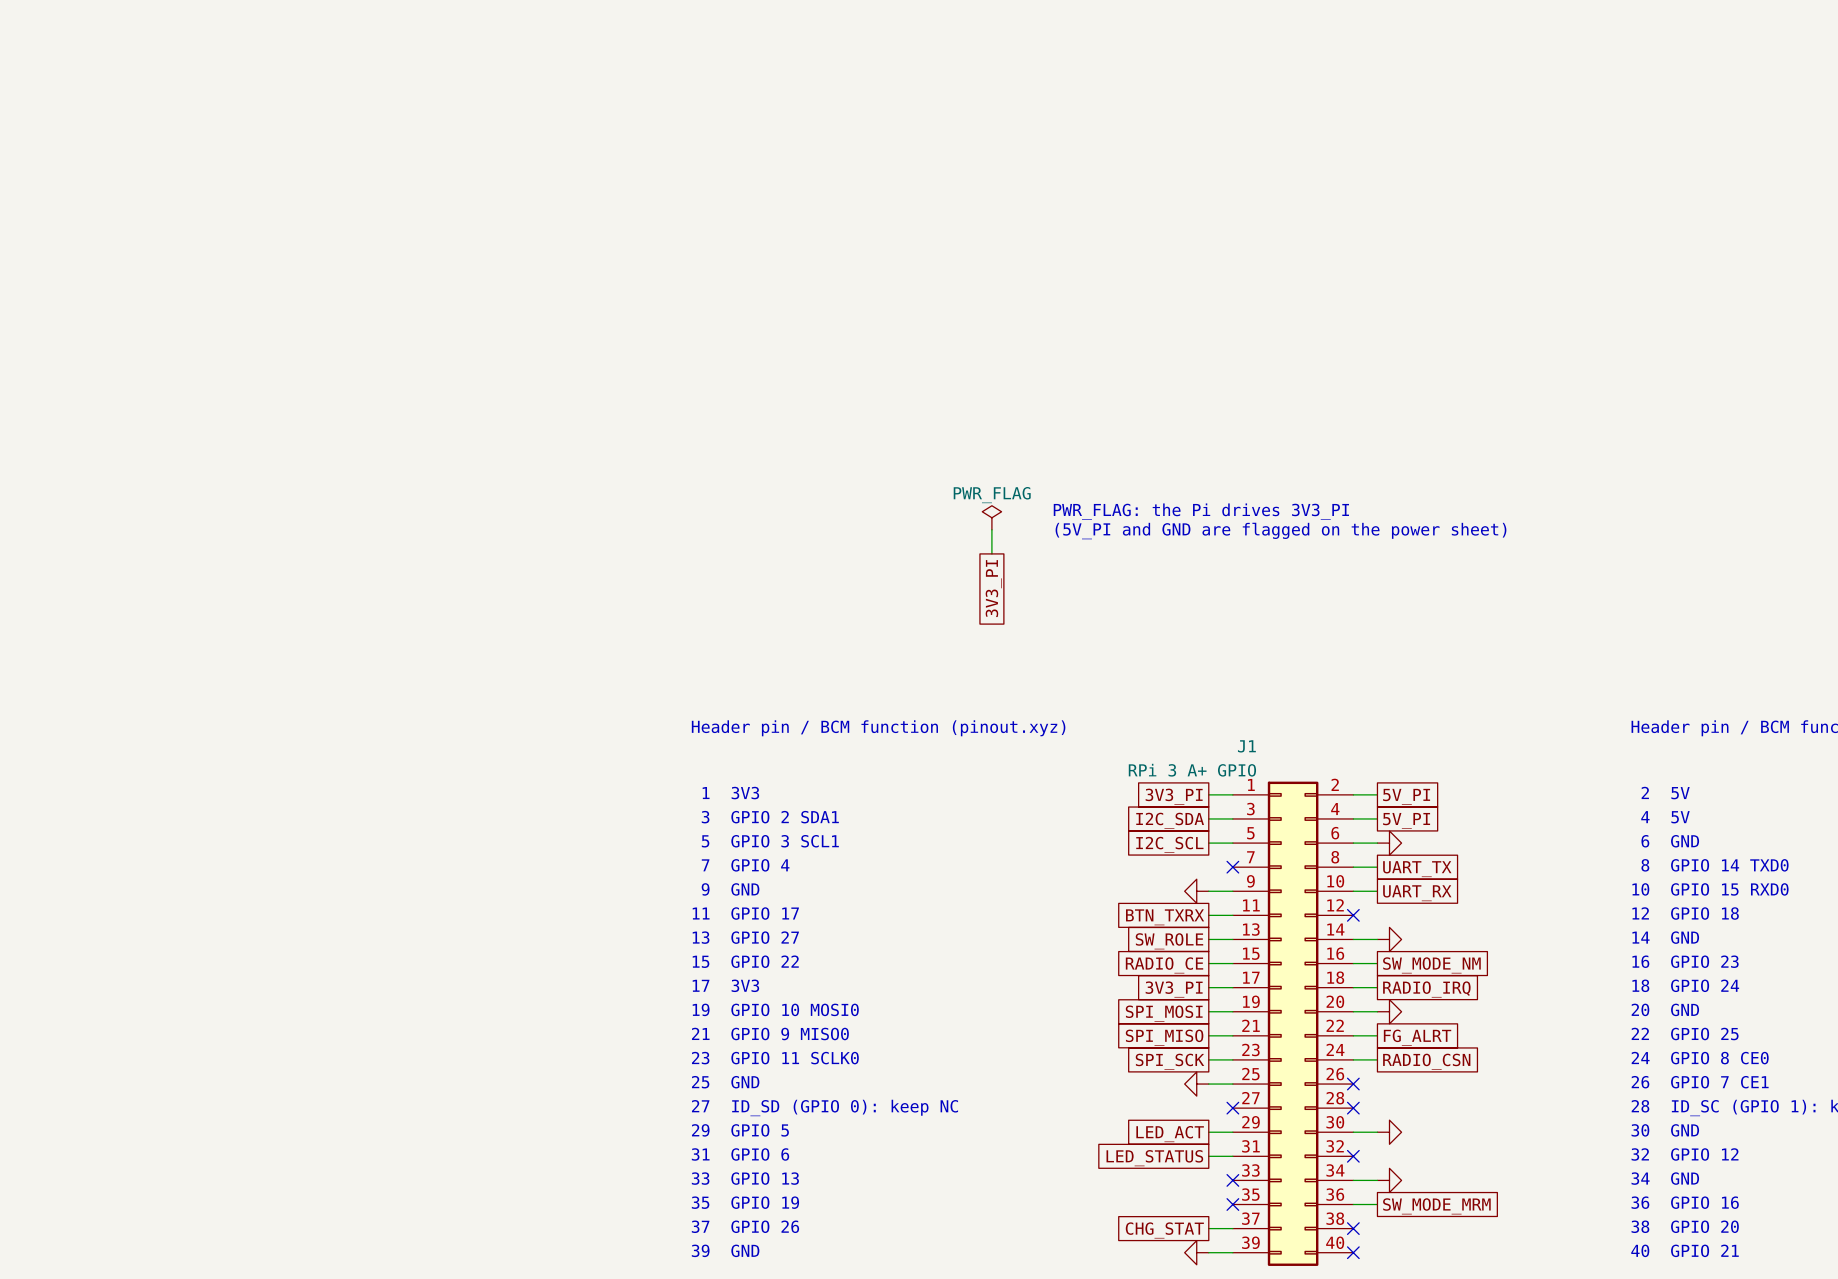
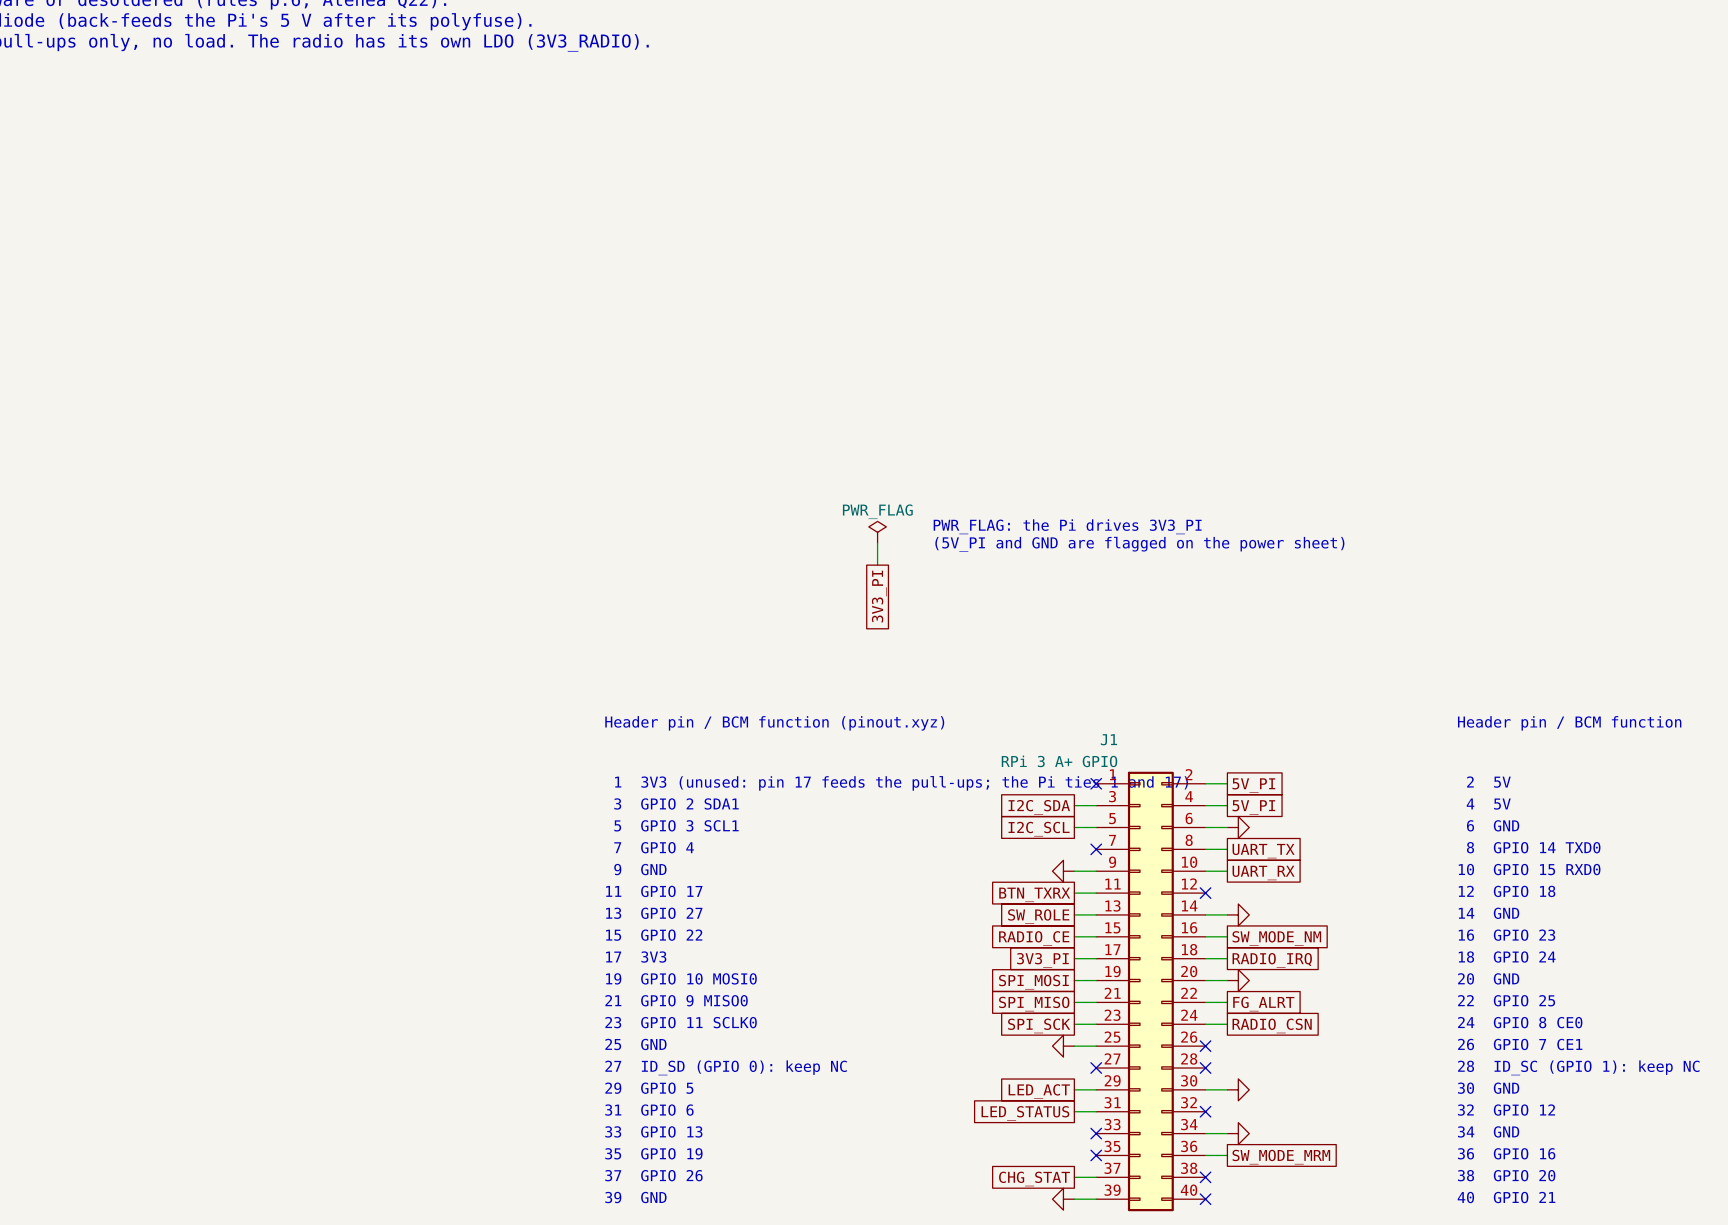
text: 1 3V3 (730, 793) -> 1 3V3 (unused: pin 17 feeds the pull-ups; the Pi ties 1 and 17) (901, 783)
wire: (1208, 794) (1232, 794) -> none
no-connect mark: none -> (1096, 783)
global label: 3V3_PI (1174, 796) -> none

